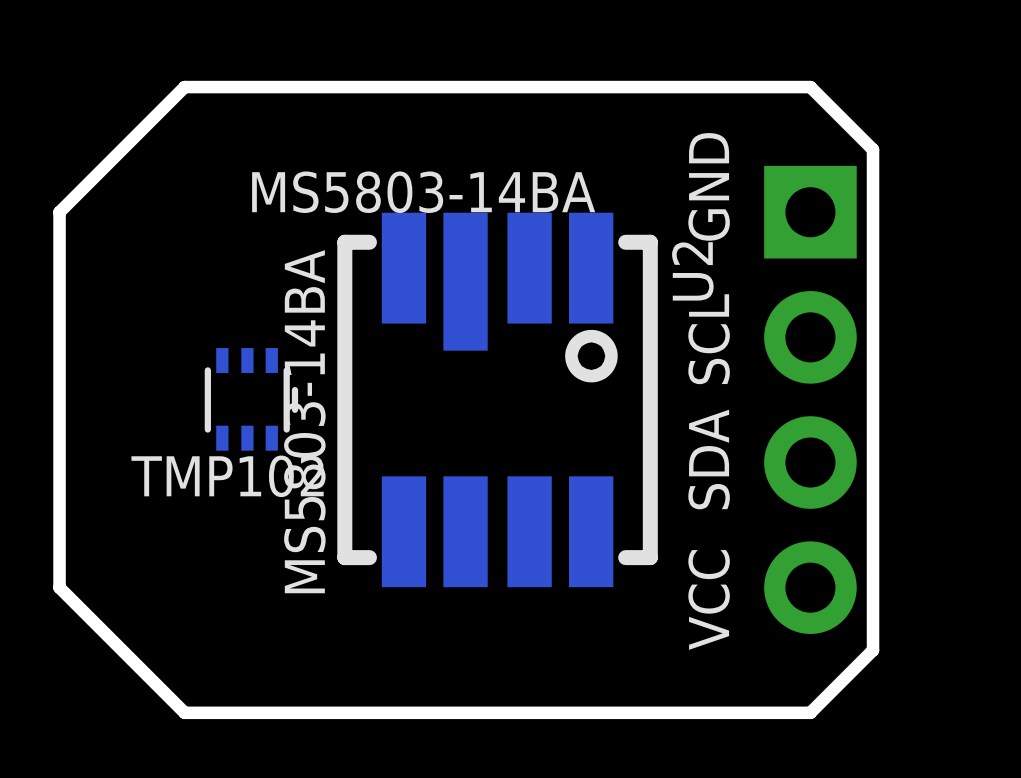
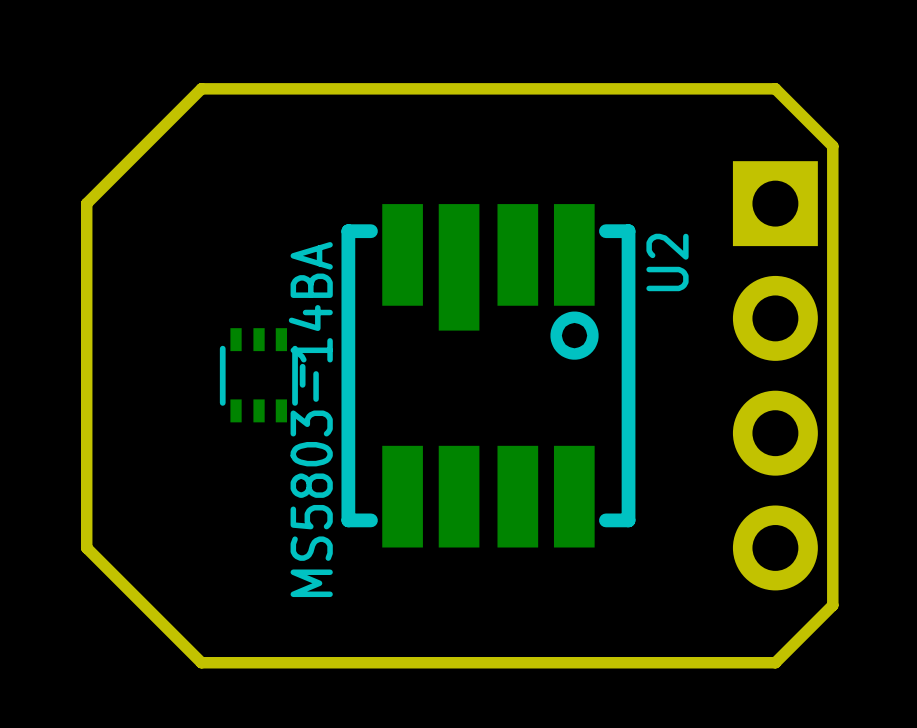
text: GND (709, 186) -> none
text: MS5803-14BA (423, 192) -> none
text: SCL (709, 339) -> none
text: SDA (709, 459) -> none
text: TMP102 (227, 476) -> none
text: VCC (709, 599) -> none

